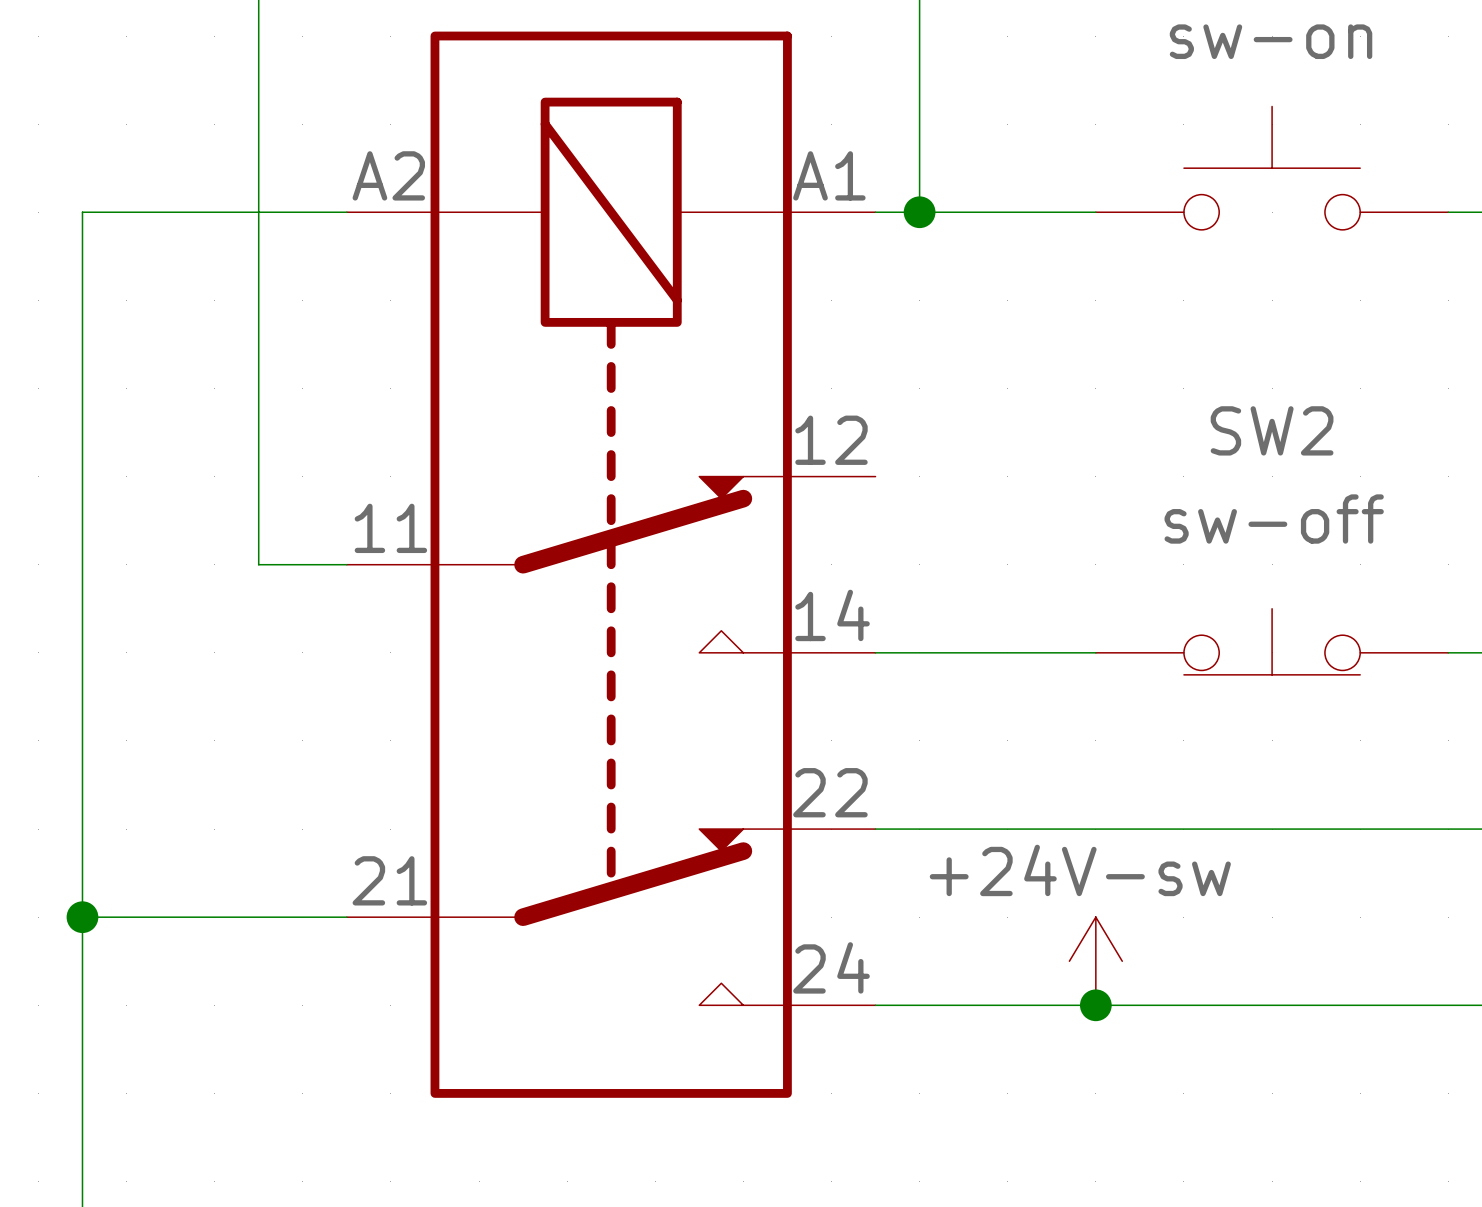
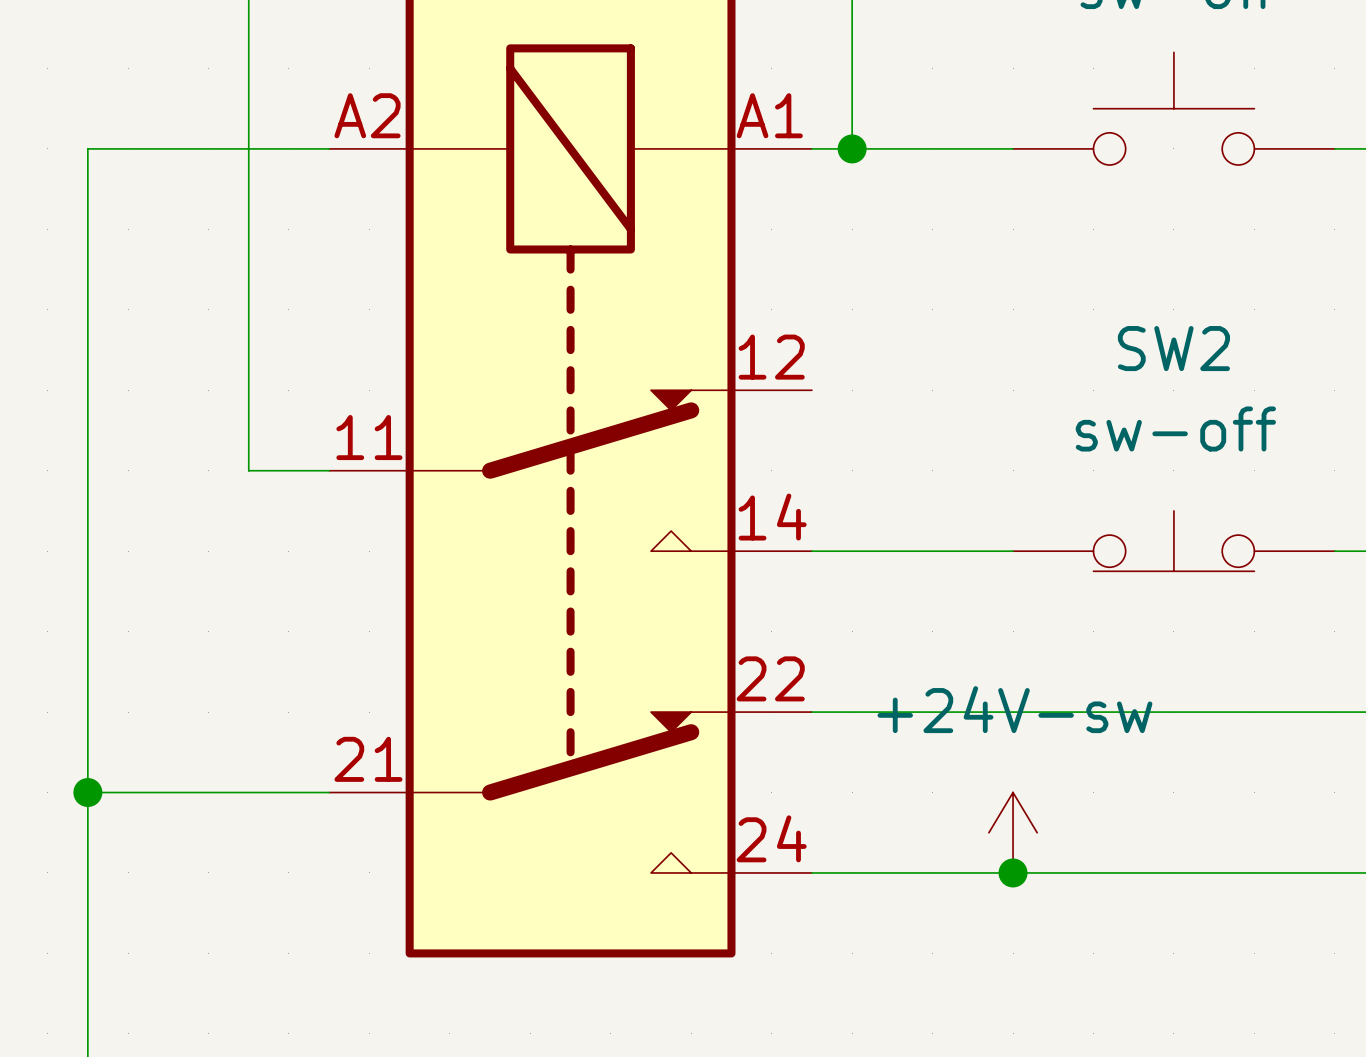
power symbol text position: +24V-sw (1080, 870) -> +24V-sw (1014, 709)

